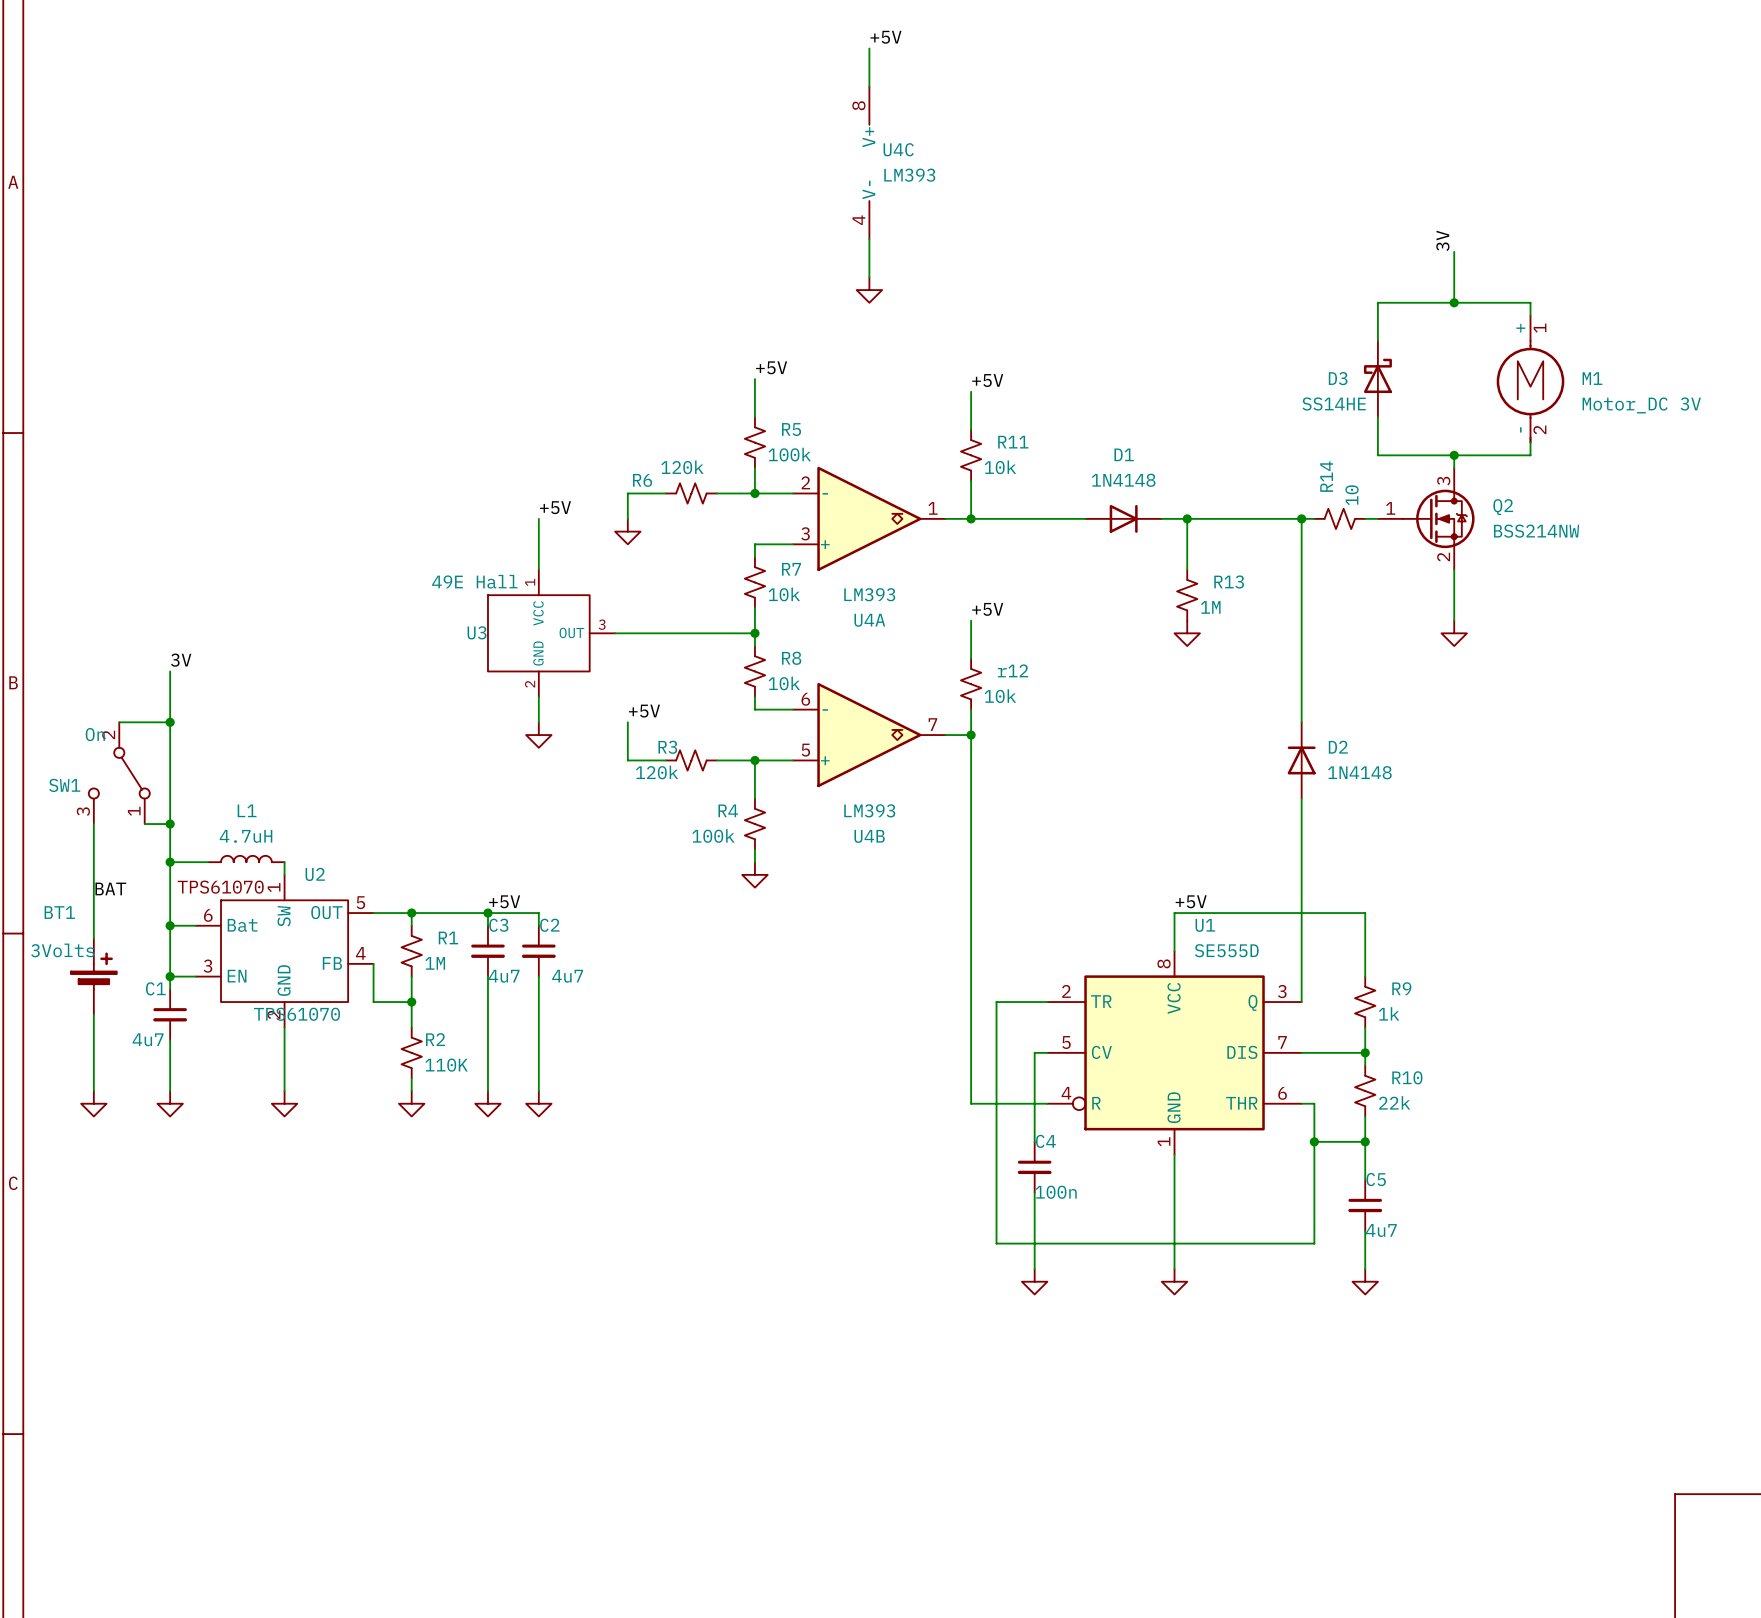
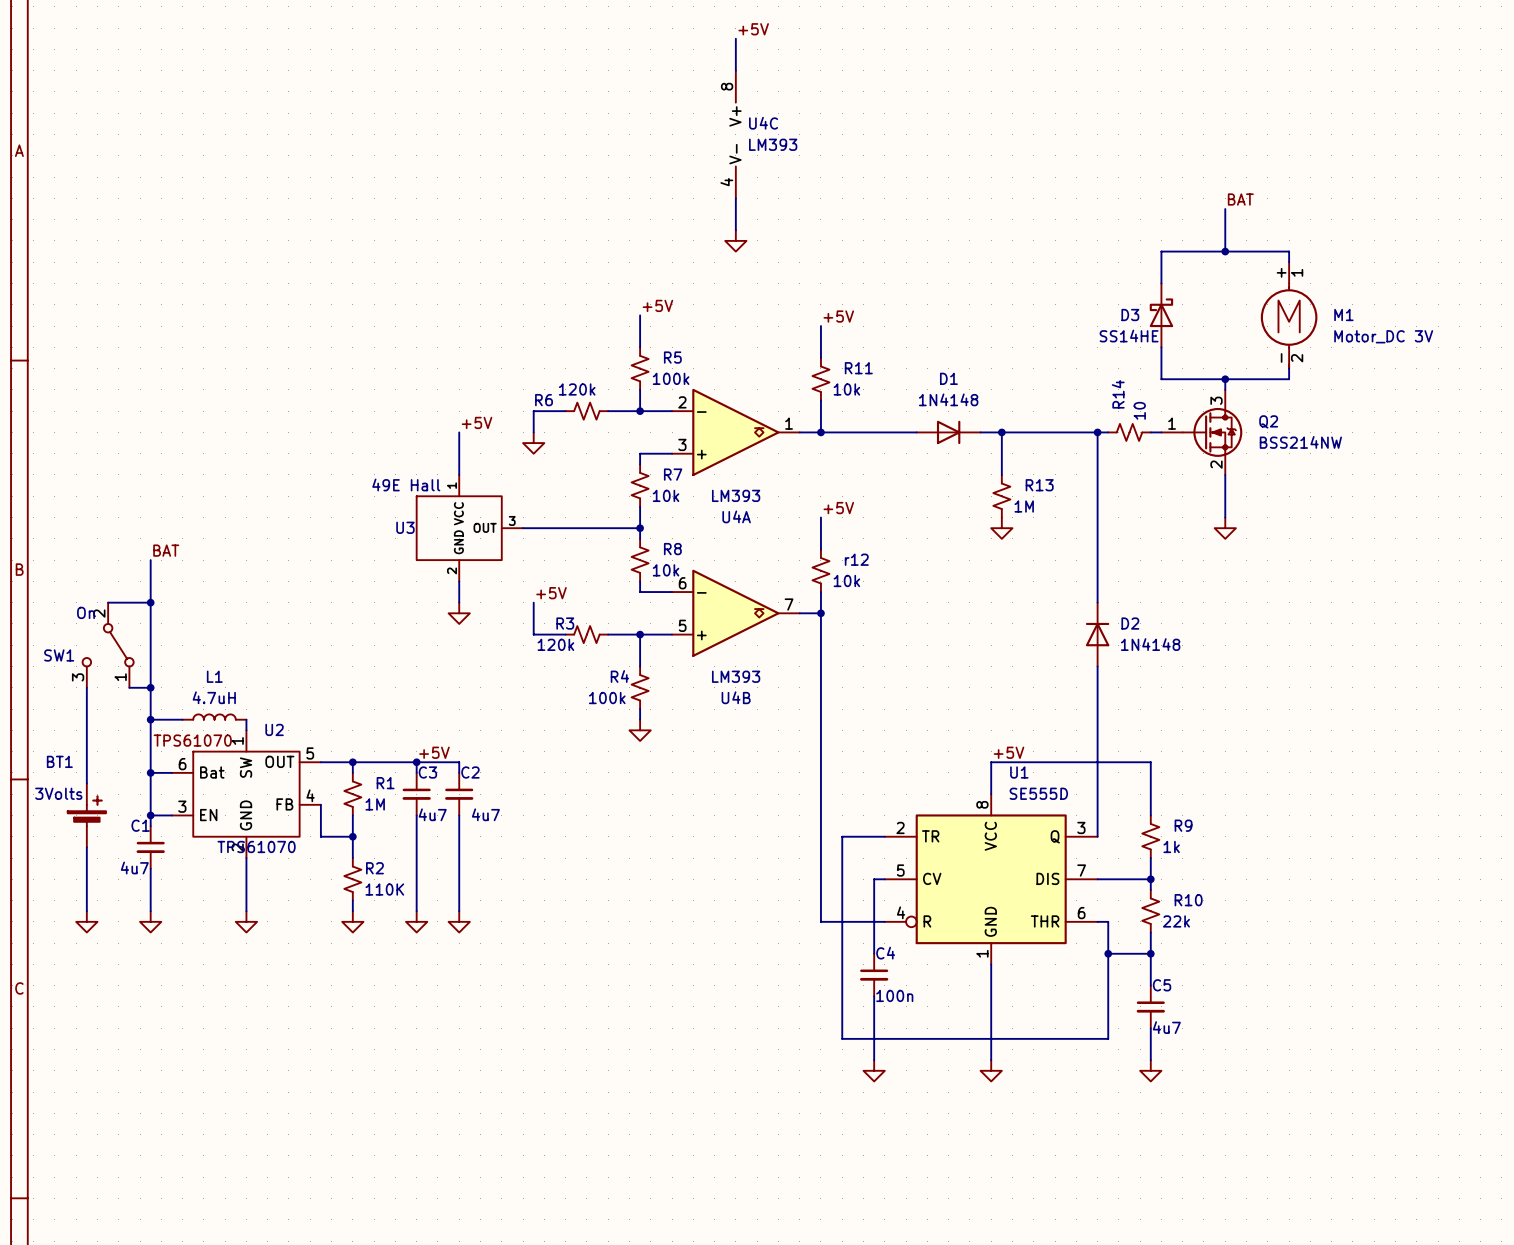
label: 3V (1442, 240) -> BAT (1240, 199)
label: 3V (181, 660) -> BAT (166, 550)
label: BAT (110, 888) -> none

